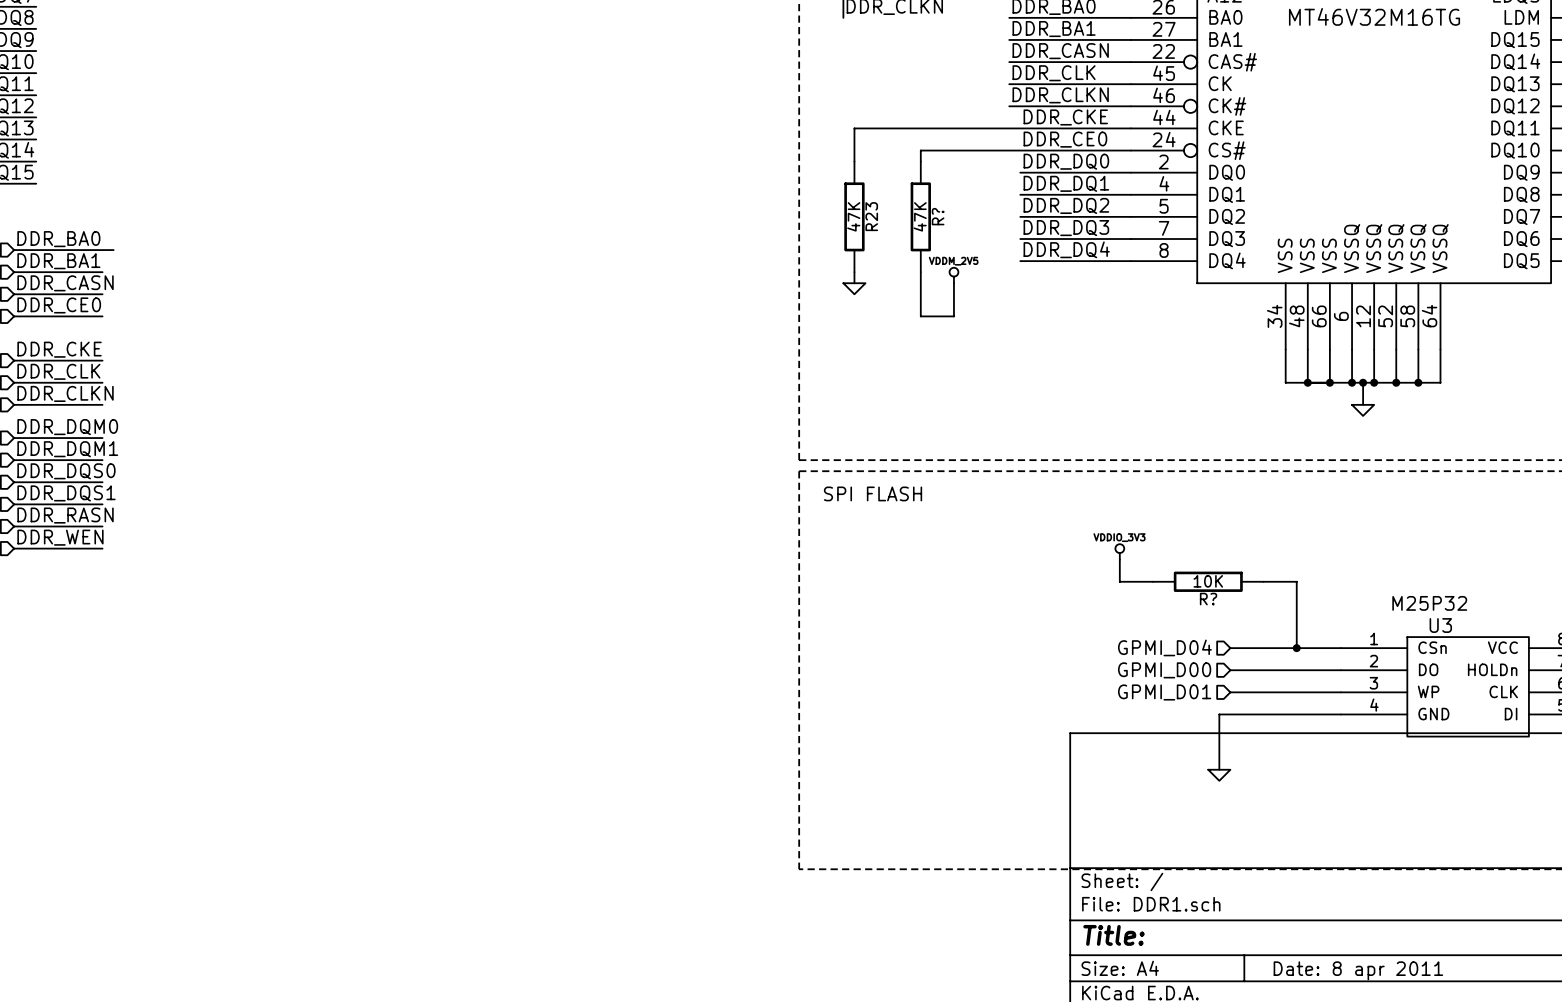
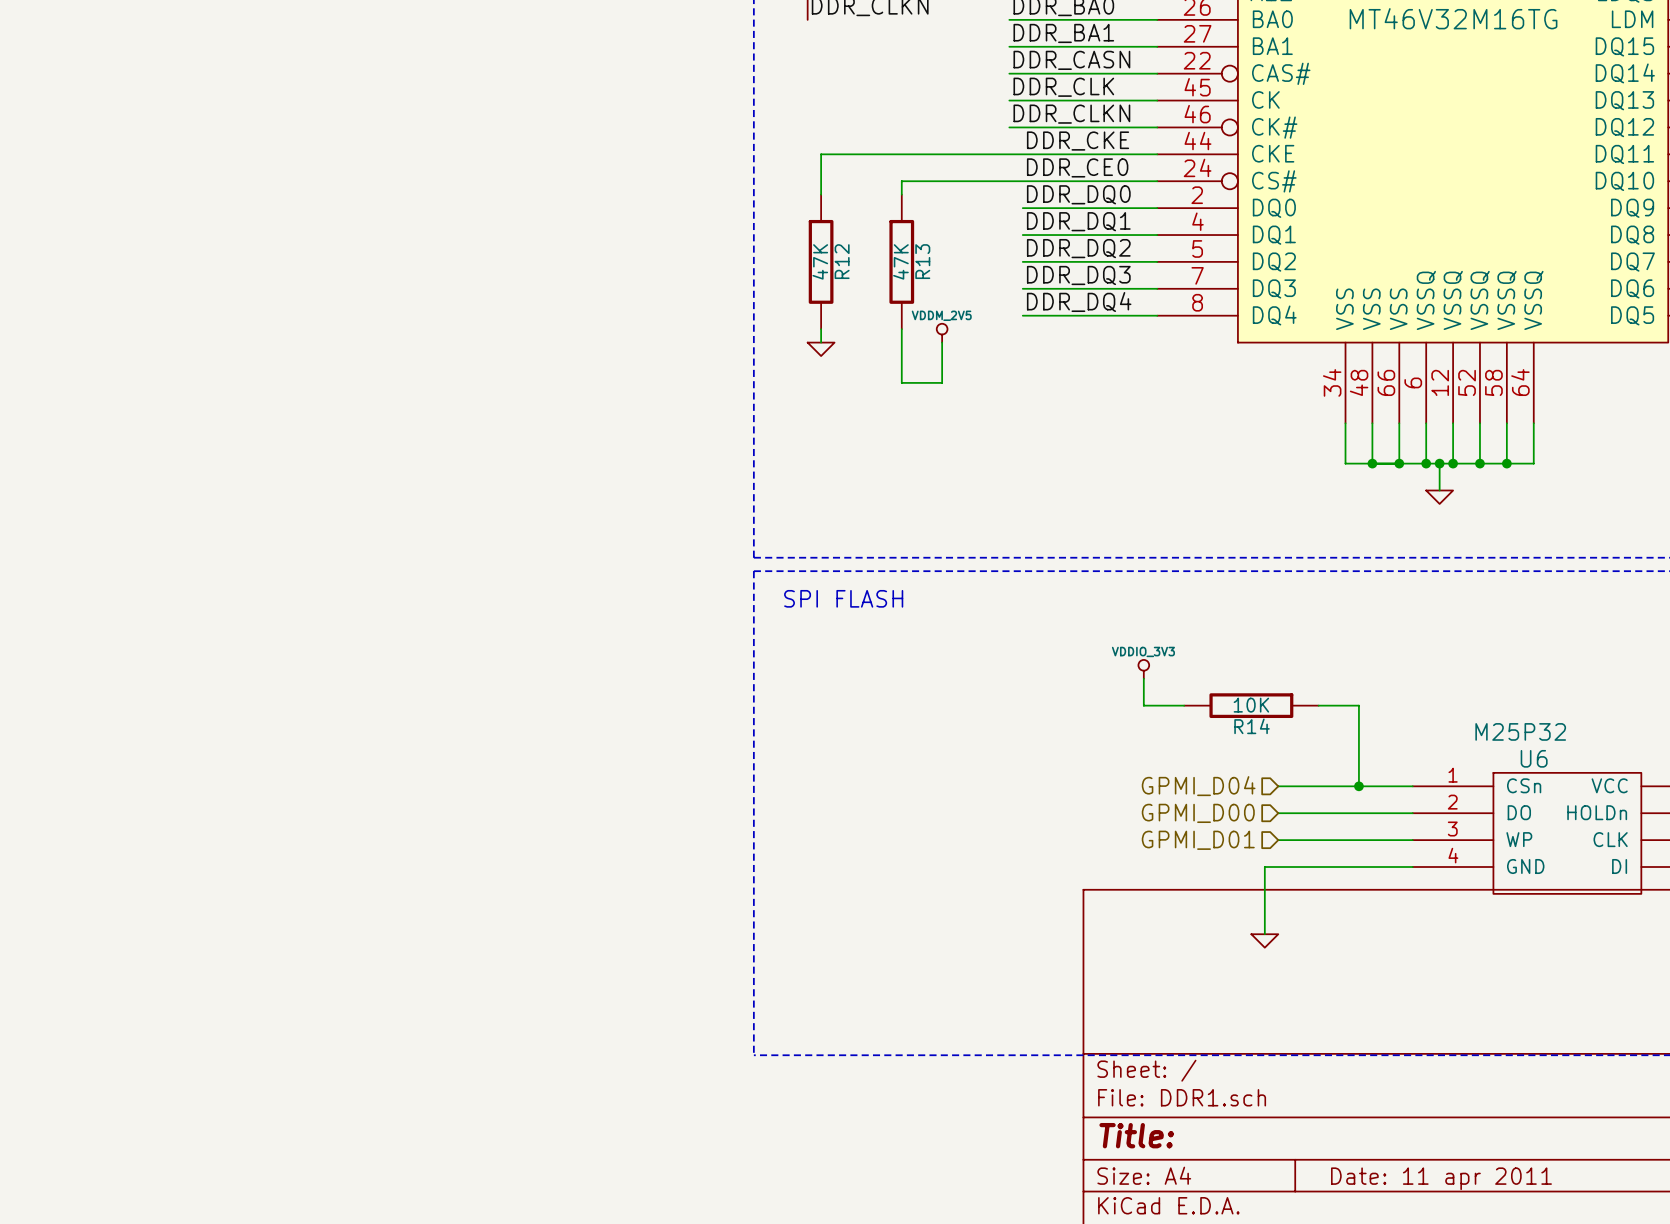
R23 name: R23 (871, 216) -> R12 (842, 261)
R? name: R? (938, 216) -> R13 (922, 261)
R? name: R? (1208, 599) -> R14 (1252, 726)
U3 name: U3 (1440, 625) -> U6 (1534, 758)
title block: Date: 8 apr 2011 (1358, 970) -> Date: 11 apr 2011 (1441, 1178)

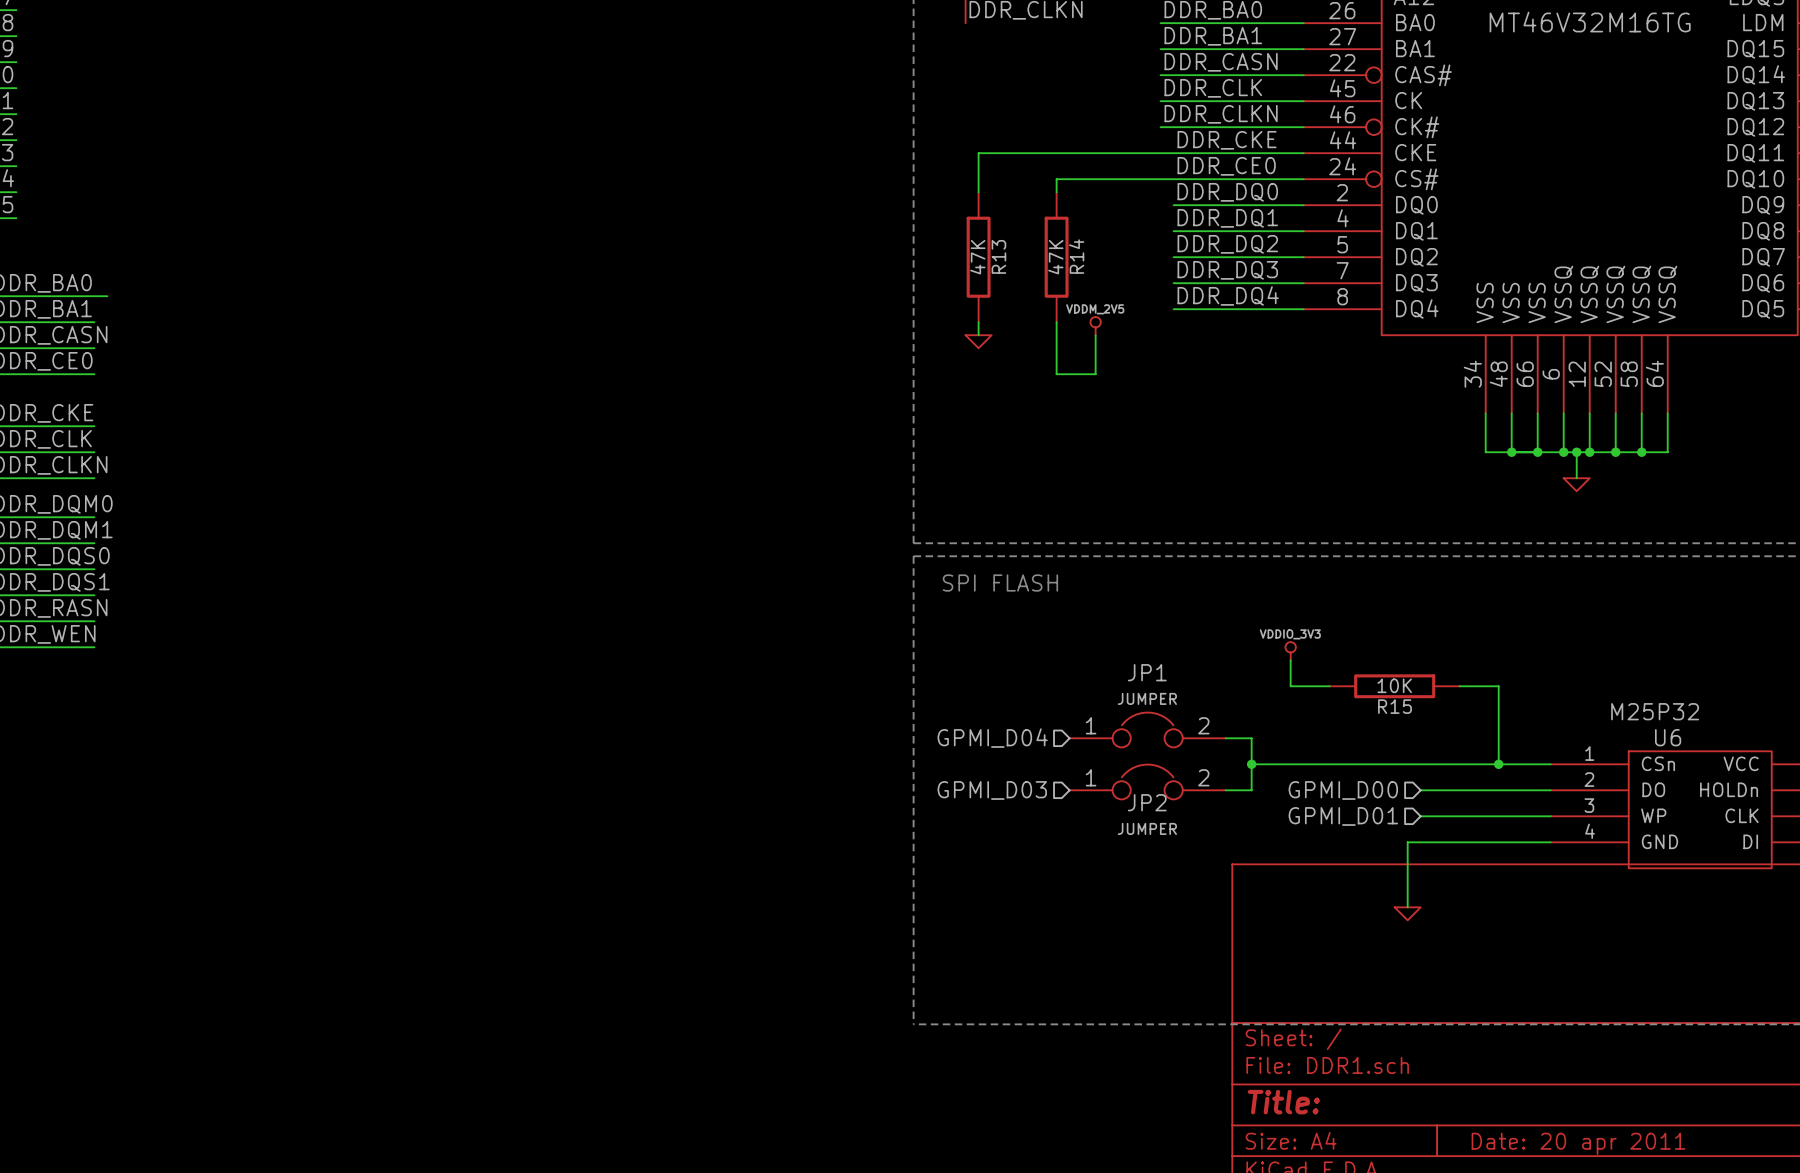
R12 name: R12 (842, 261) -> R13 (998, 256)
R13 name: R13 (922, 261) -> R14 (1076, 256)
R14 name: R14 (1252, 726) -> R15 (1394, 706)
JP1: none -> JUMPER (1147, 729)
hierarchical label: none -> GPMI_D04 (992, 738)
wire: none -> (1225, 738) (1251, 738) (1251, 790) (1225, 790)
wire: none -> (1251, 764) (1420, 764)
junction: none -> (1251, 764)
hierarchical label: GPMI_D04 (1198, 786) -> none
JP2: none -> JUMPER (1147, 781)
hierarchical label: none -> GPMI_D03 (992, 790)
title block: Date: 11 apr 2011 (1441, 1178) -> Date: 20 apr 2011 (1578, 1143)

